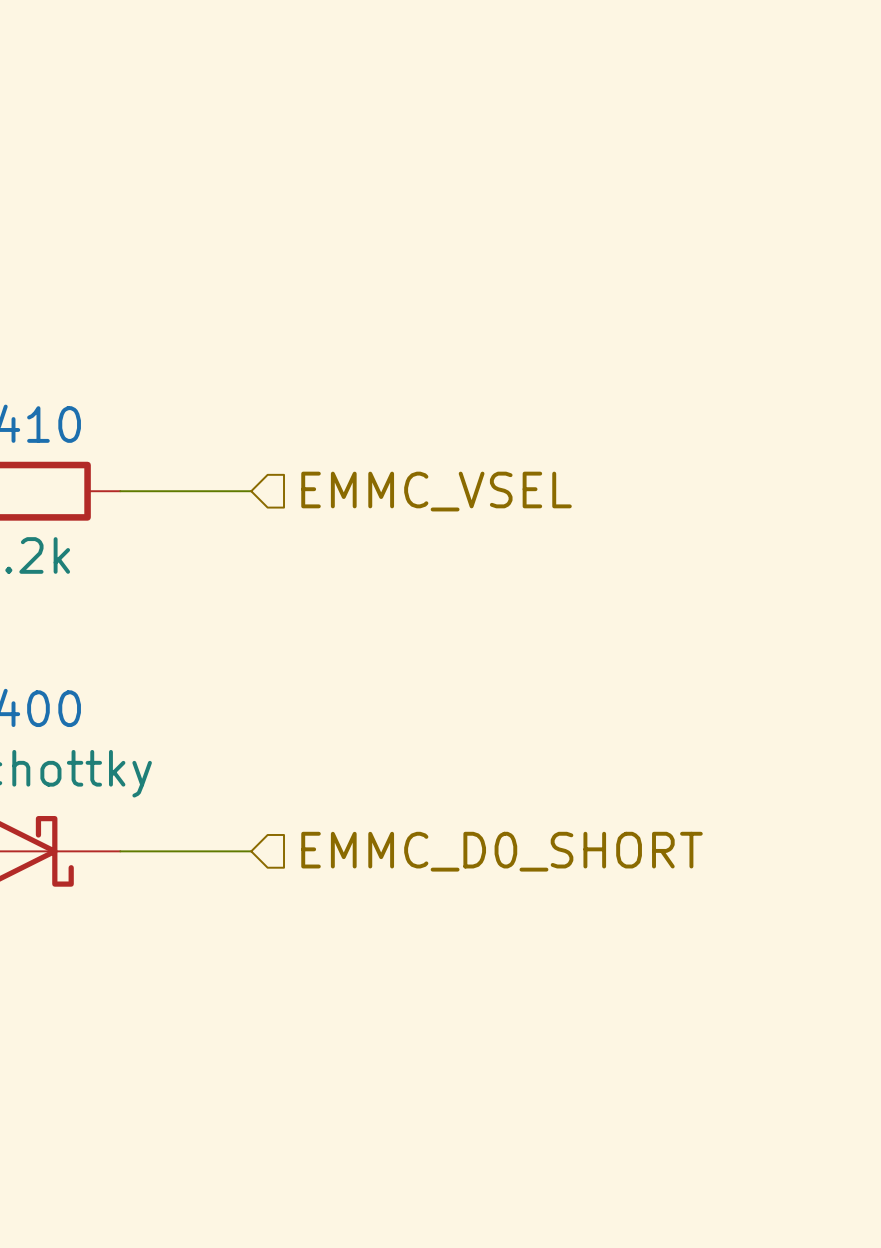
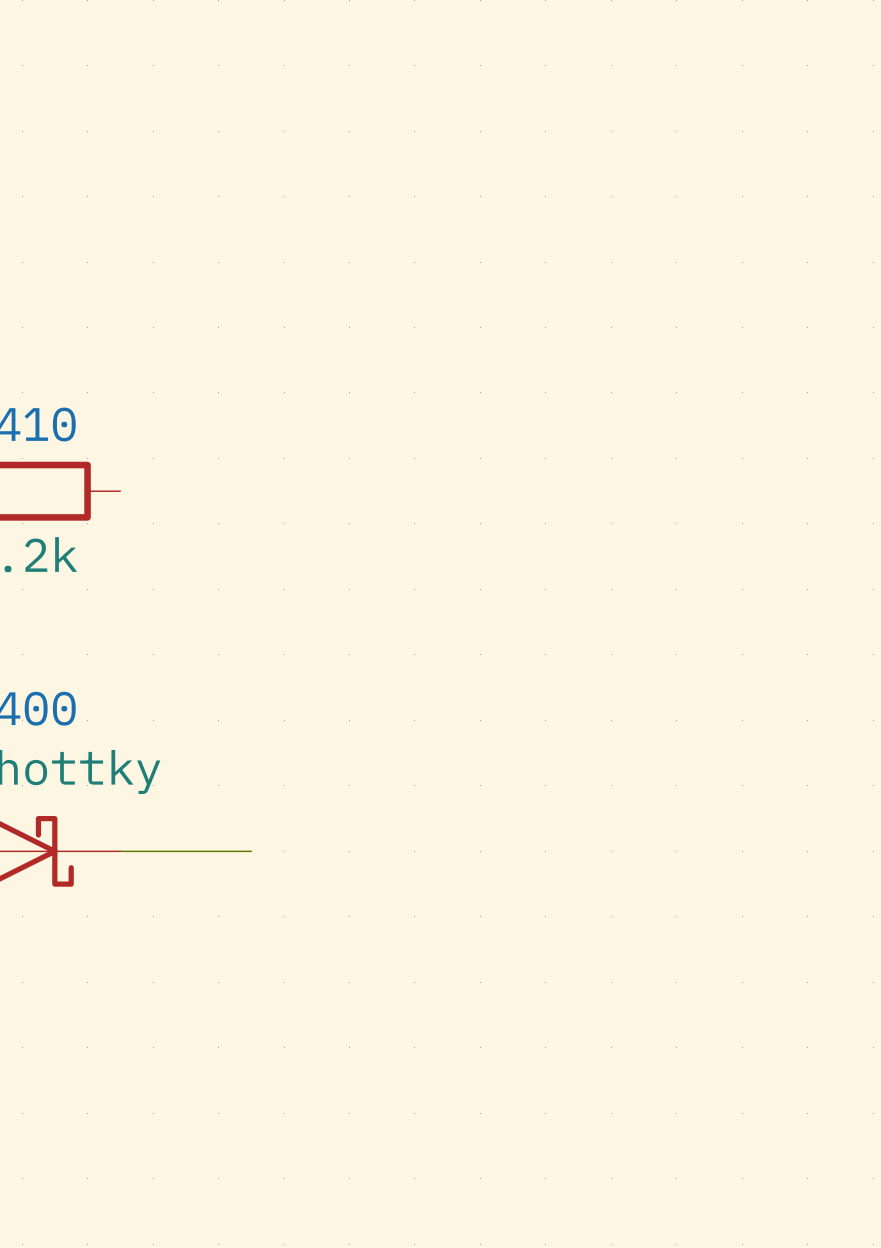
wire: (120, 491) (251, 491) -> none
hierarchical label: EMMC_VSEL (436, 491) -> none
hierarchical label: EMMC_D0_SHORT (502, 851) -> none

